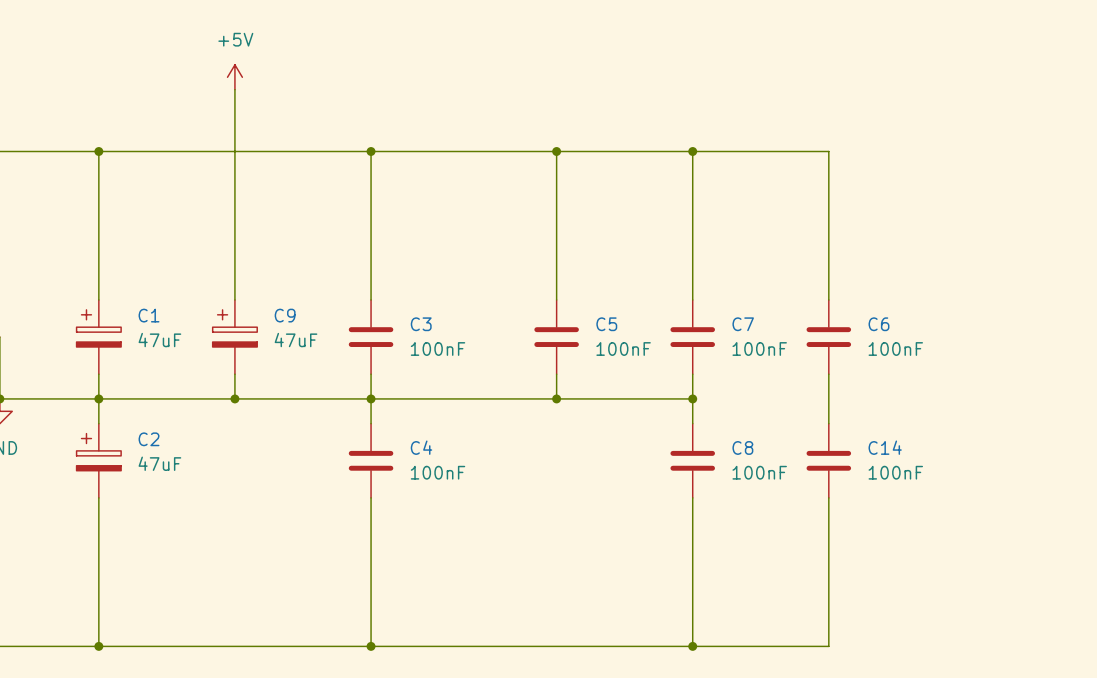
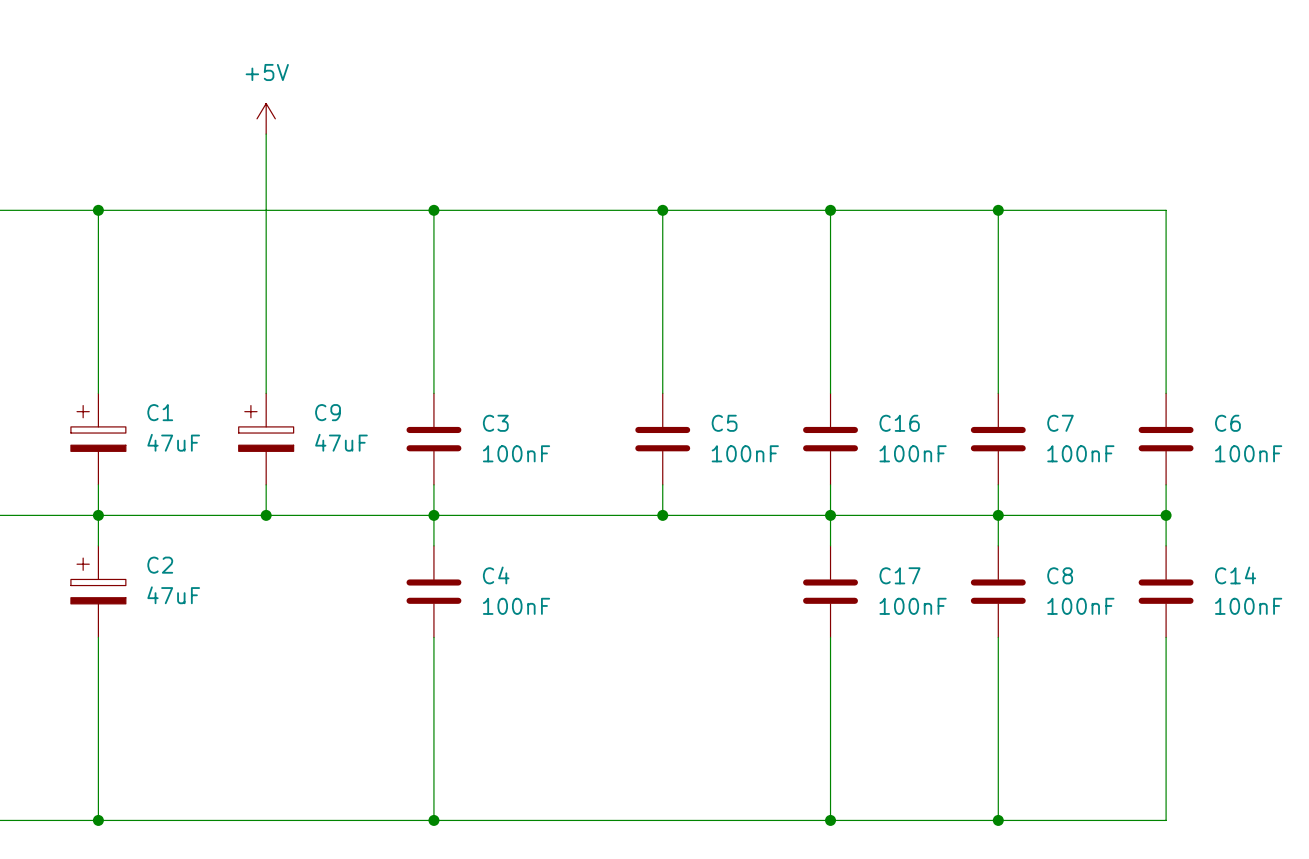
wire: none -> (998, 210) (1166, 210) (1166, 393)
junction: none -> (998, 210)
C7 name: C7 (743, 324) -> C16 (899, 423)
C6 name: C6 (878, 324) -> C7 (1060, 423)
C6: none -> 100nF (1166, 439)
wire: none -> (1166, 484) (1166, 545)
wire: none -> (830, 515) (1166, 515)
junction: none -> (998, 515)
junction: none -> (1166, 515)
C8 name: C8 (742, 447) -> C17 (900, 575)
C14 name: C14 (885, 447) -> C8 (1060, 575)
C14: none -> 100nF (1166, 591)
wire: none -> (1166, 637) (1166, 820) (998, 820)
junction: none -> (998, 820)

